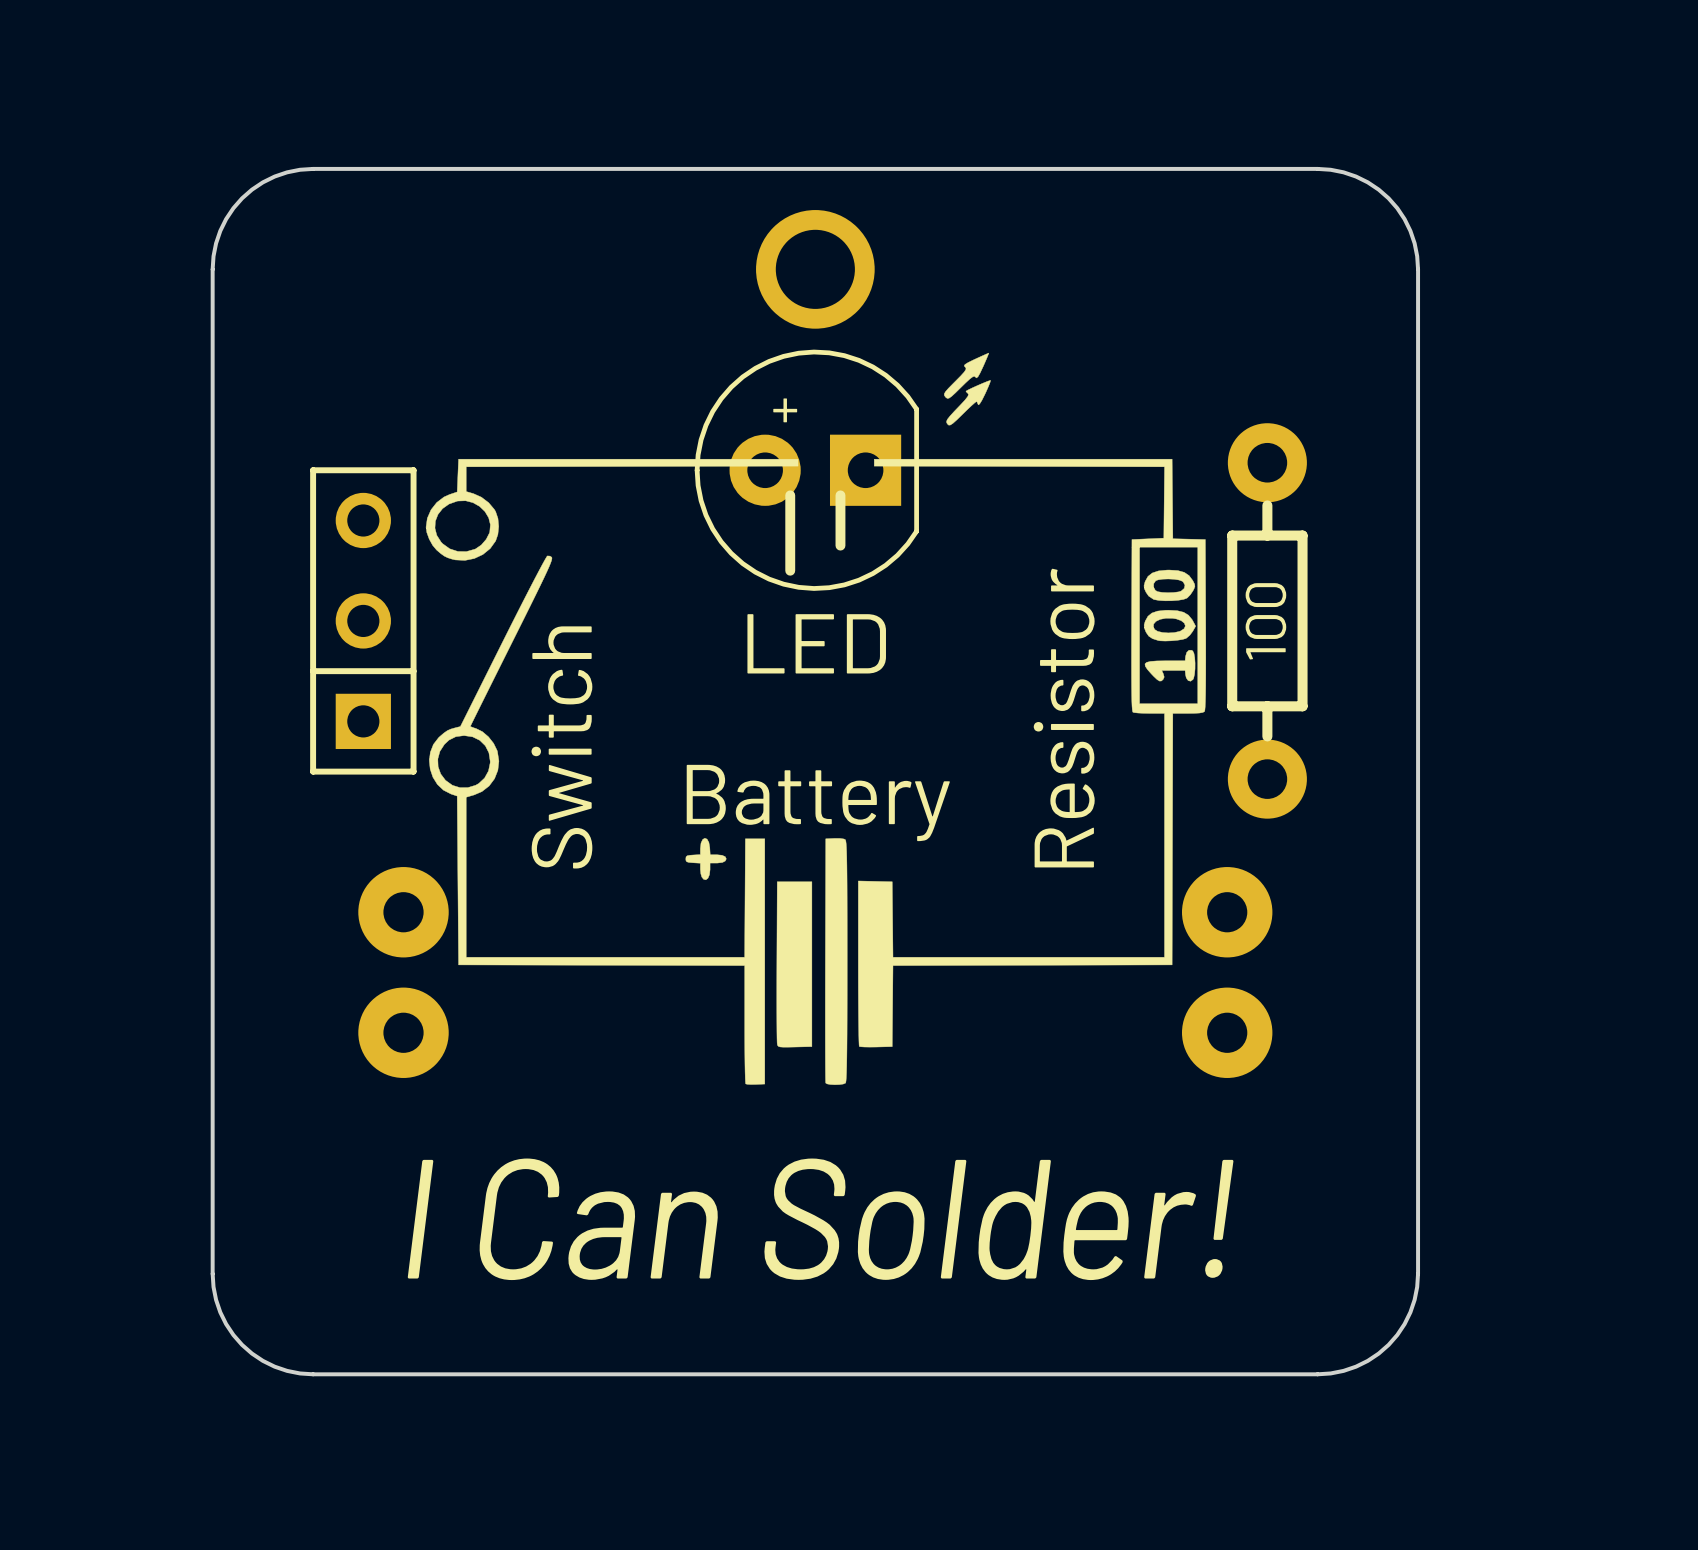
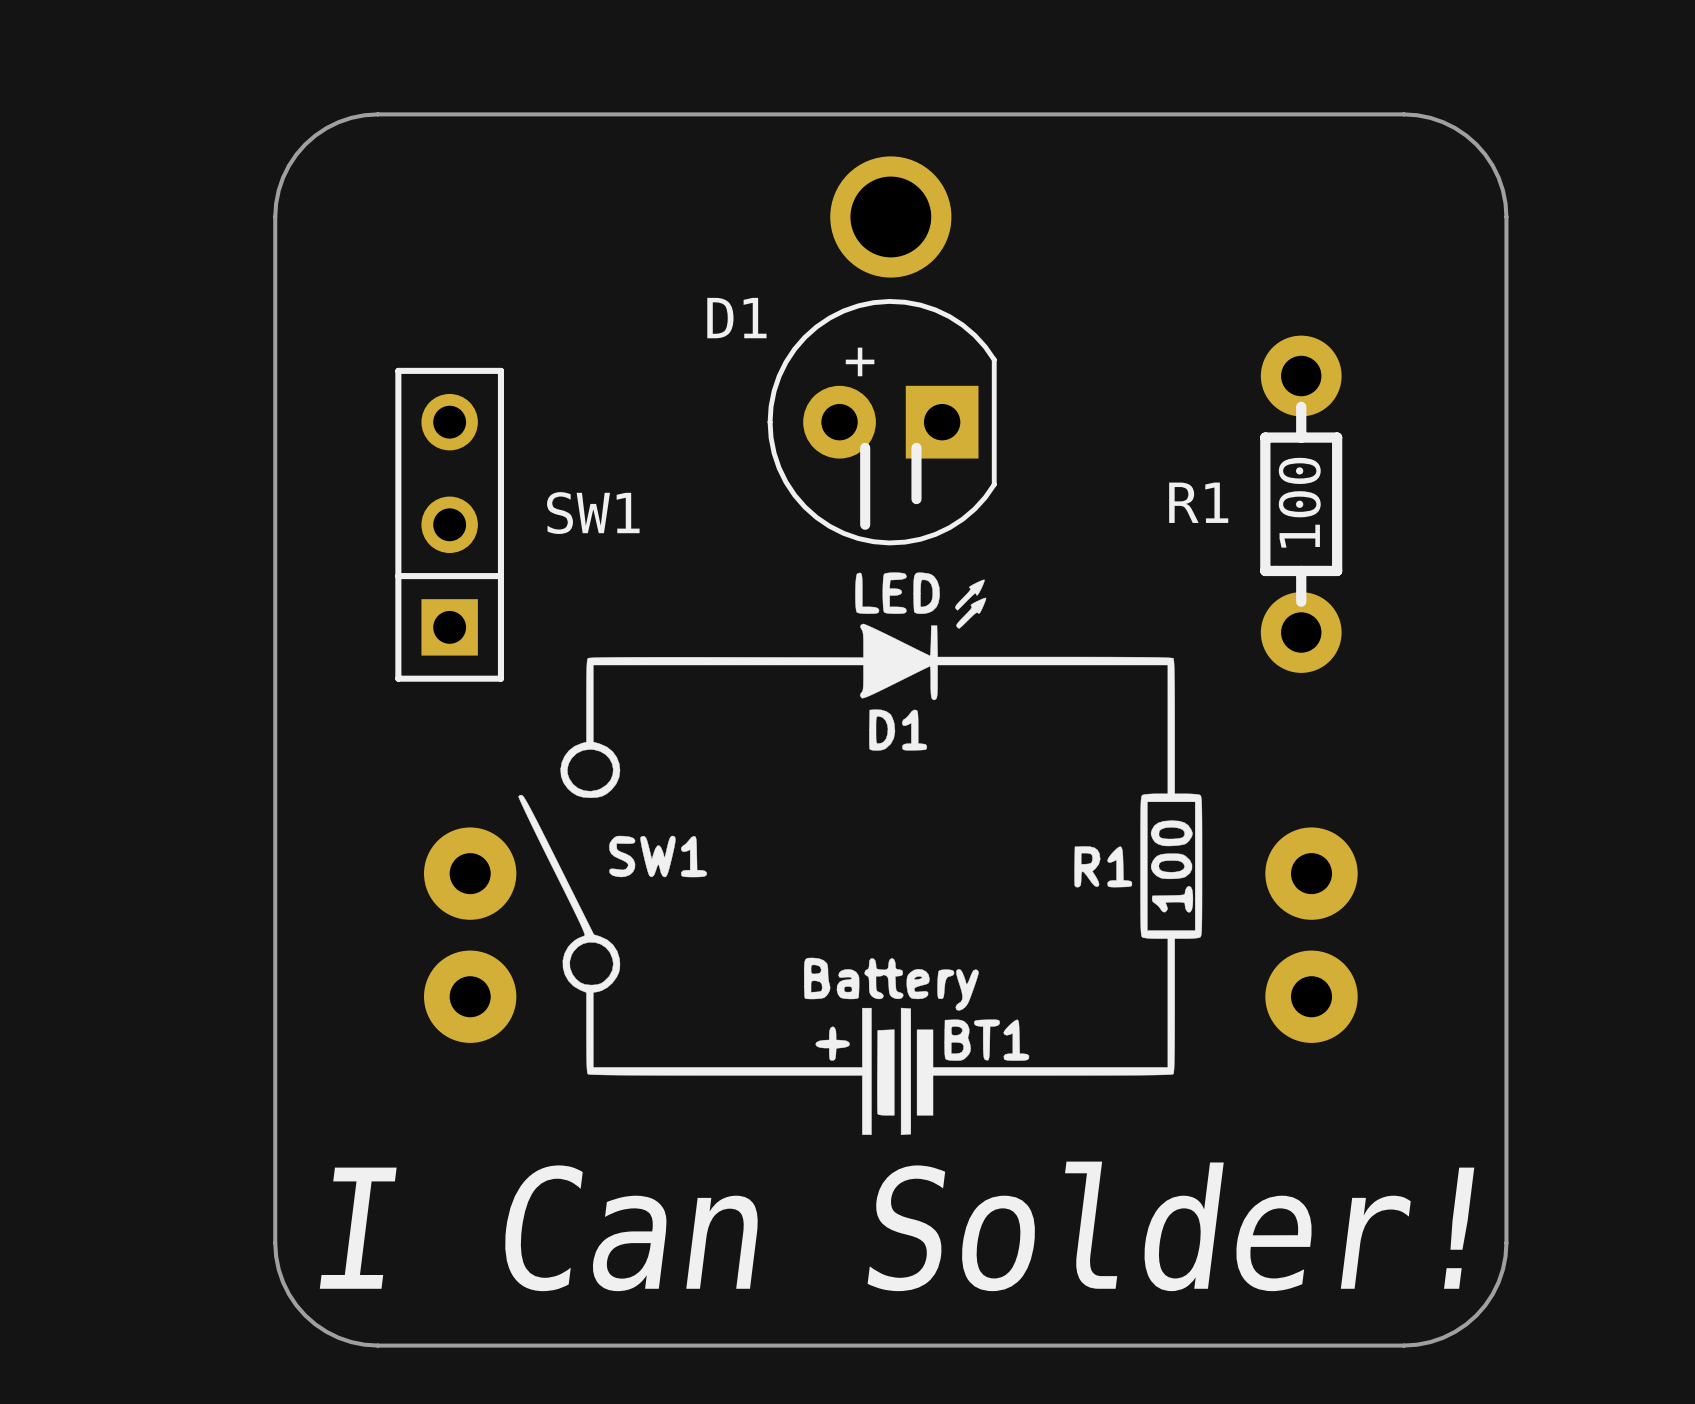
drawing: [425, 352, 1207, 1085] -> none
D1 name: none -> D1 (736, 318)
R1: none -> 100 (1301, 504)
SW1: none -> (449, 524)
drawing: none -> [518, 572, 1203, 1136]
part: (363, 620) -> none
part: 100 (1267, 620) -> none
text: LED (816, 643) -> none
text: Resistor (1064, 718) -> none
text: Switch (561, 747) -> none
text: Battery (818, 802) -> none
text position: I Can Solder! (820, 1219) -> I Can Solder! (897, 1226)

